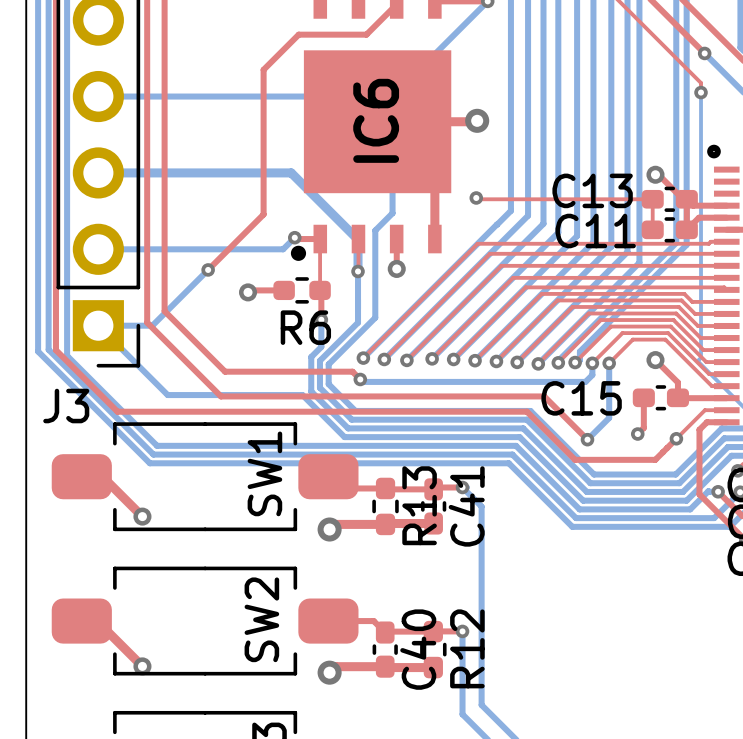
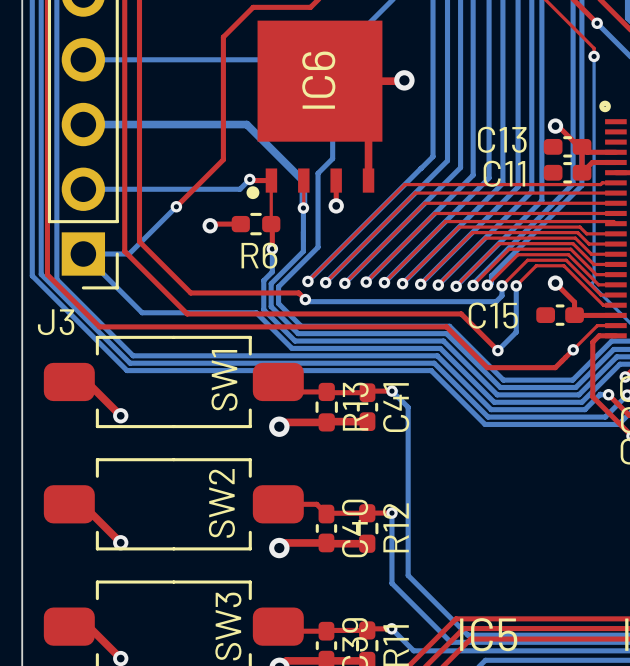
top track: (476, 197) (652, 199) (652, 229) -> none
via: (476, 197) -> none
top track: (643, 397) (643, 427) (637, 434) -> none
via: (637, 434) -> none

